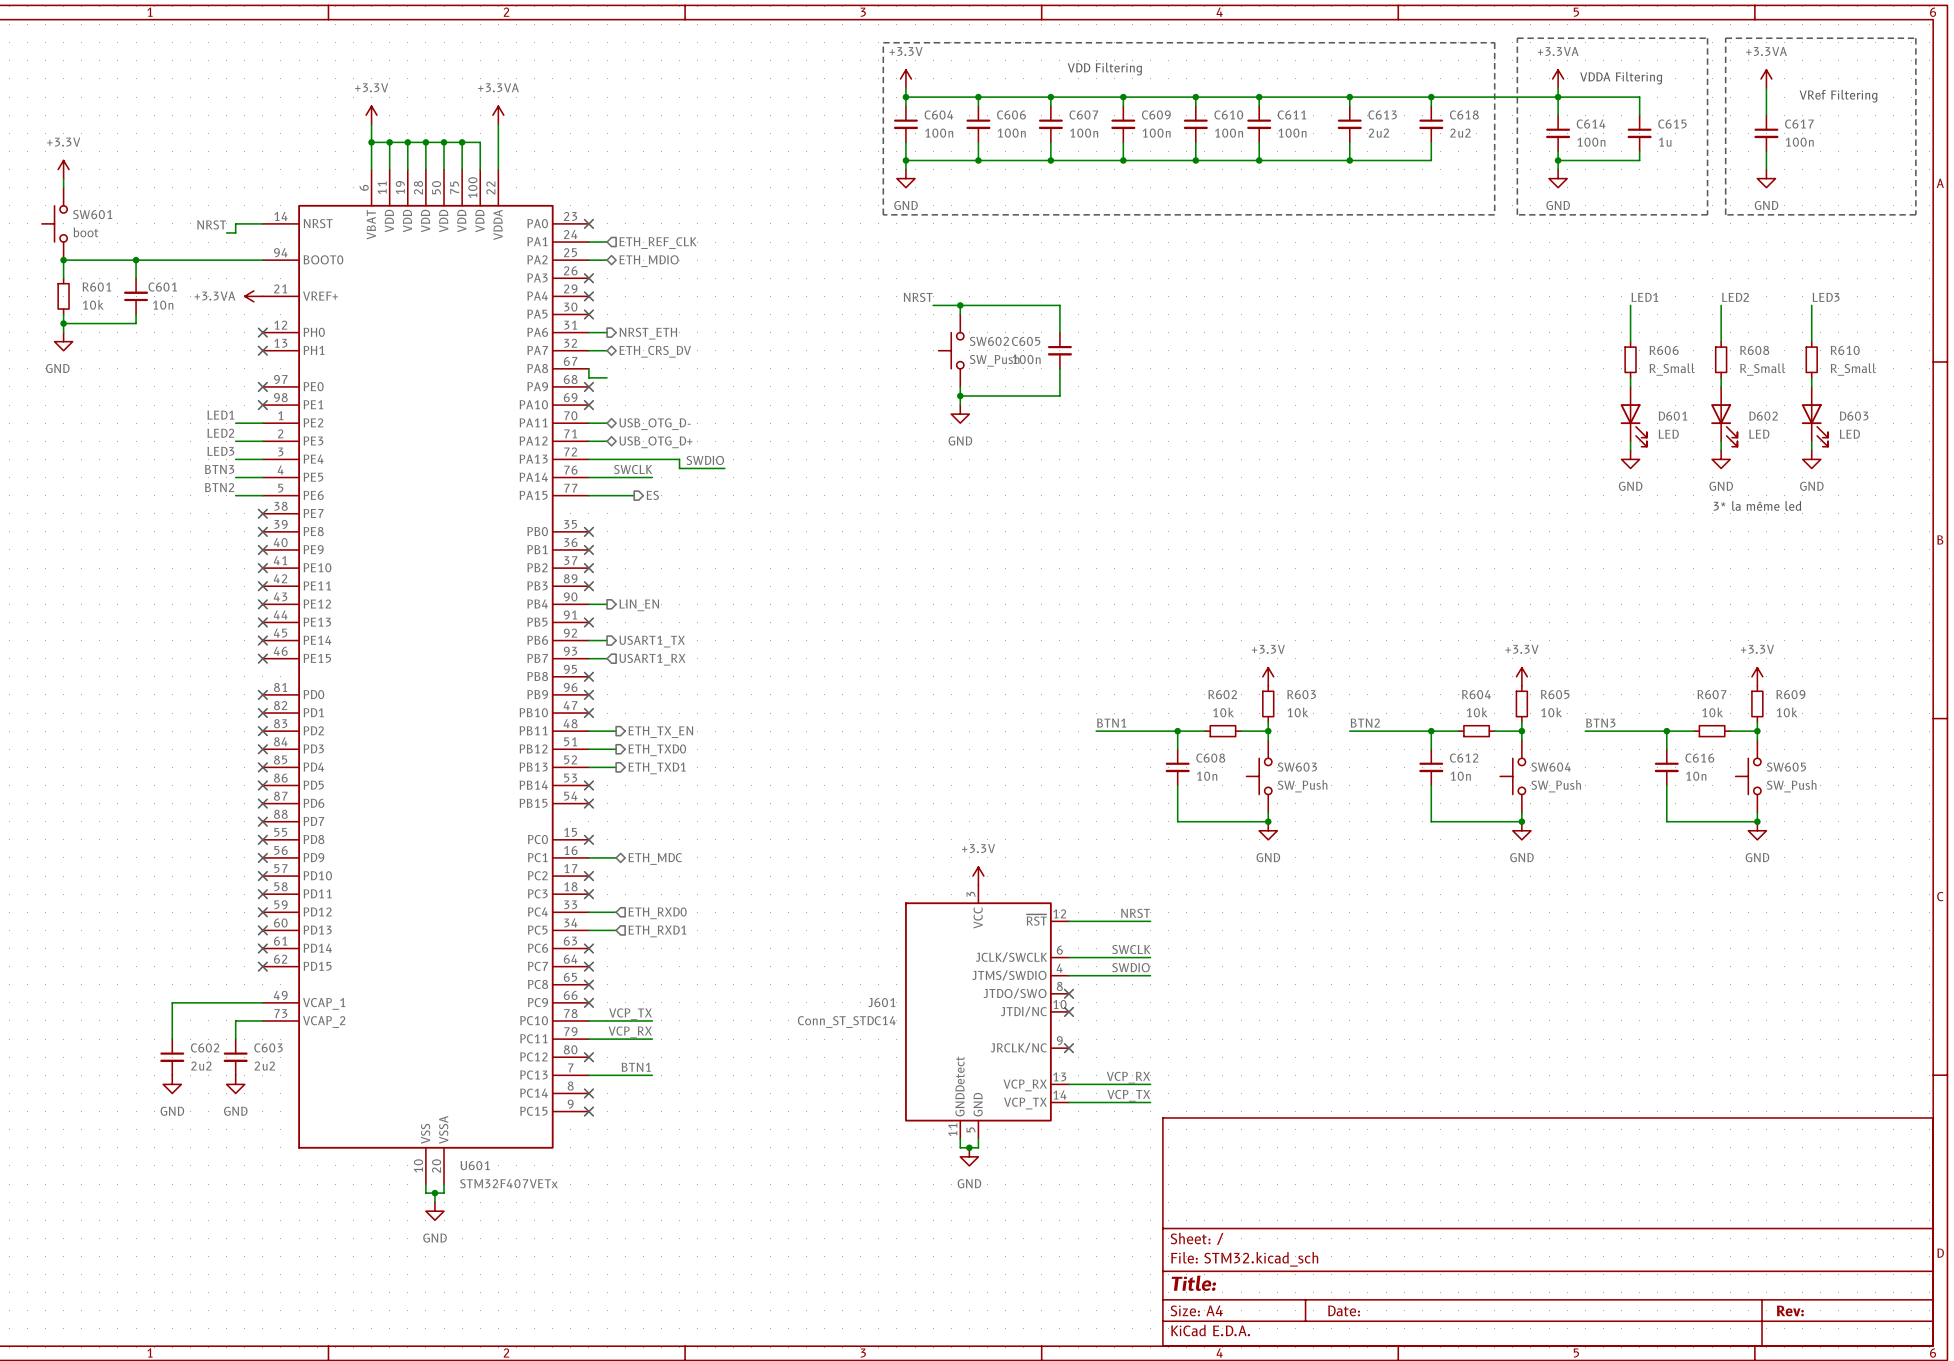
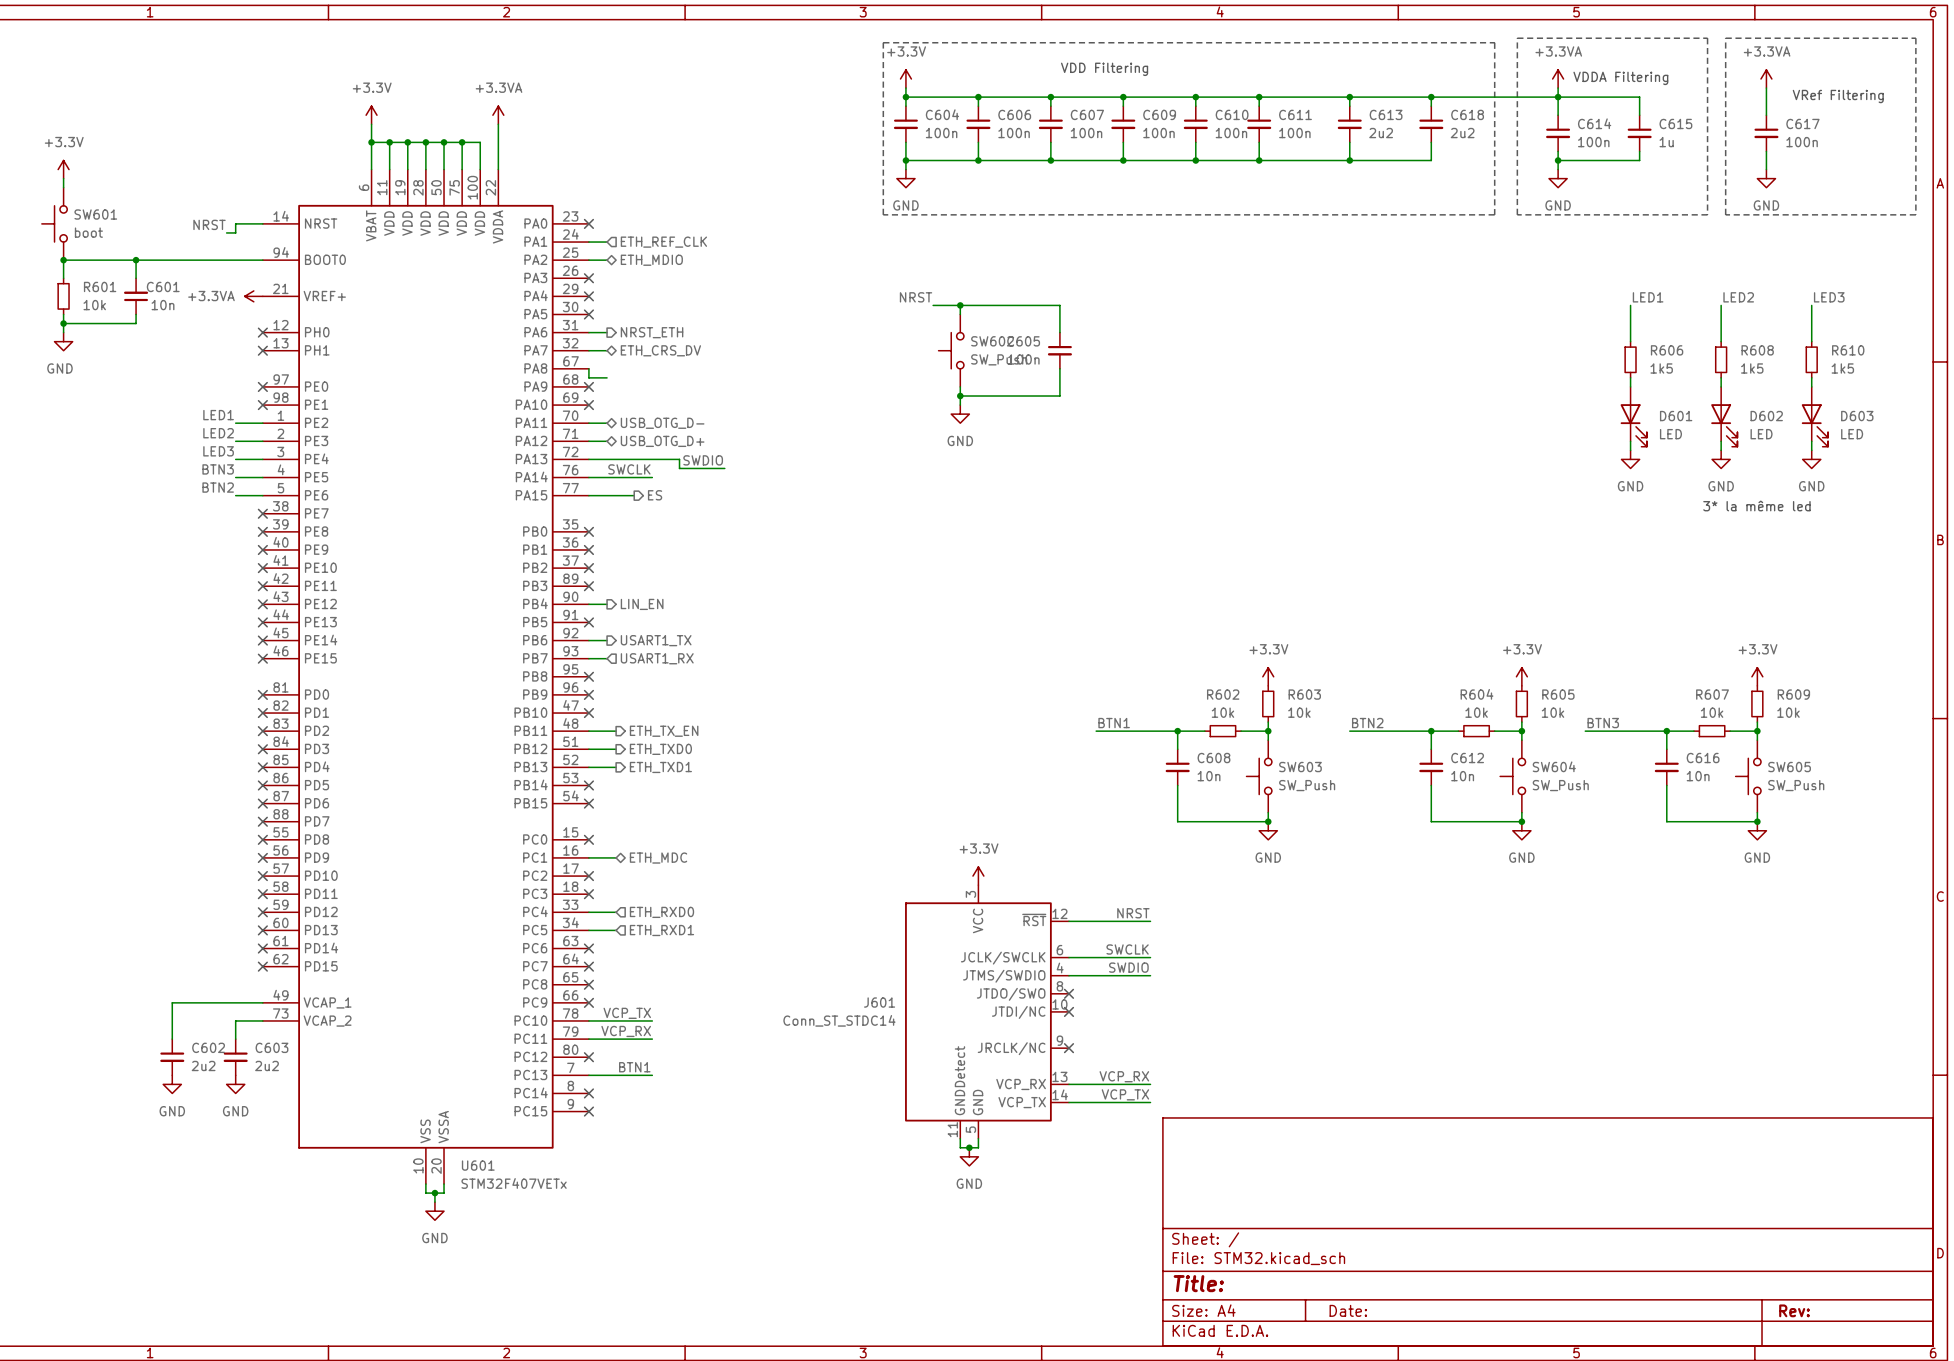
R606 value: R_Small (1672, 369) -> 1k5 (1661, 368)
R608 value: R_Small (1762, 369) -> 1k5 (1752, 368)
R610 value: R_Small (1853, 369) -> 1k5 (1842, 368)

